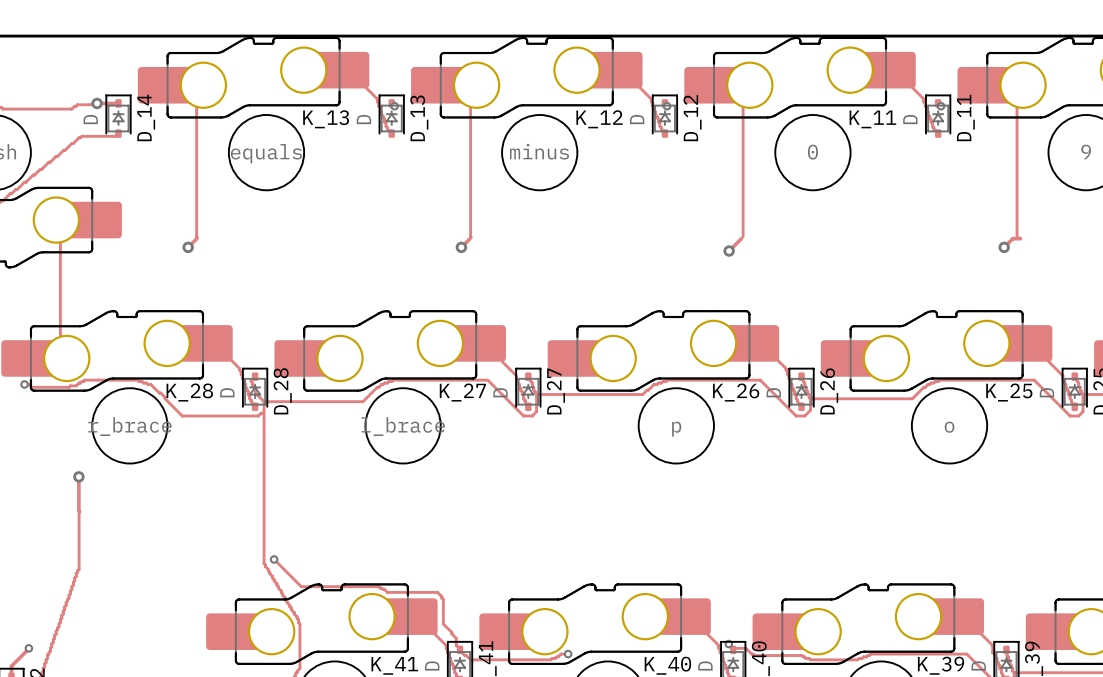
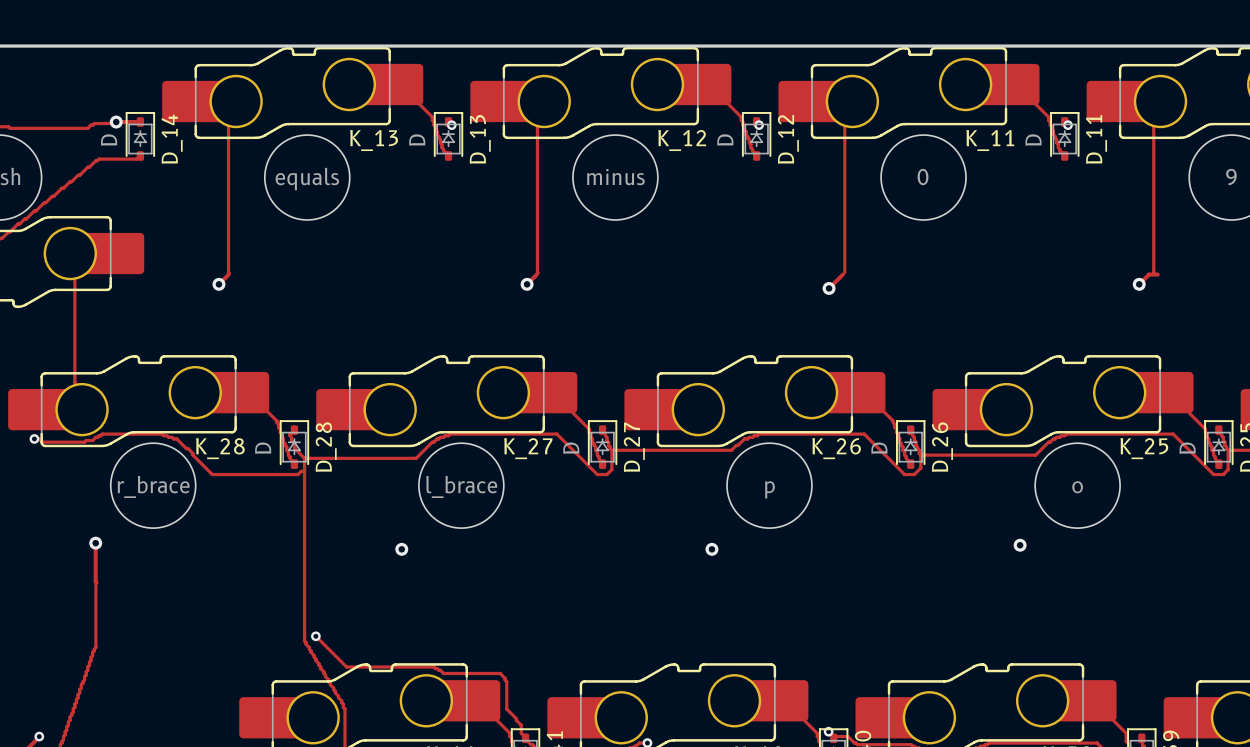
via: none -> (1020, 545)
via: none -> (401, 549)
via: none -> (711, 549)

